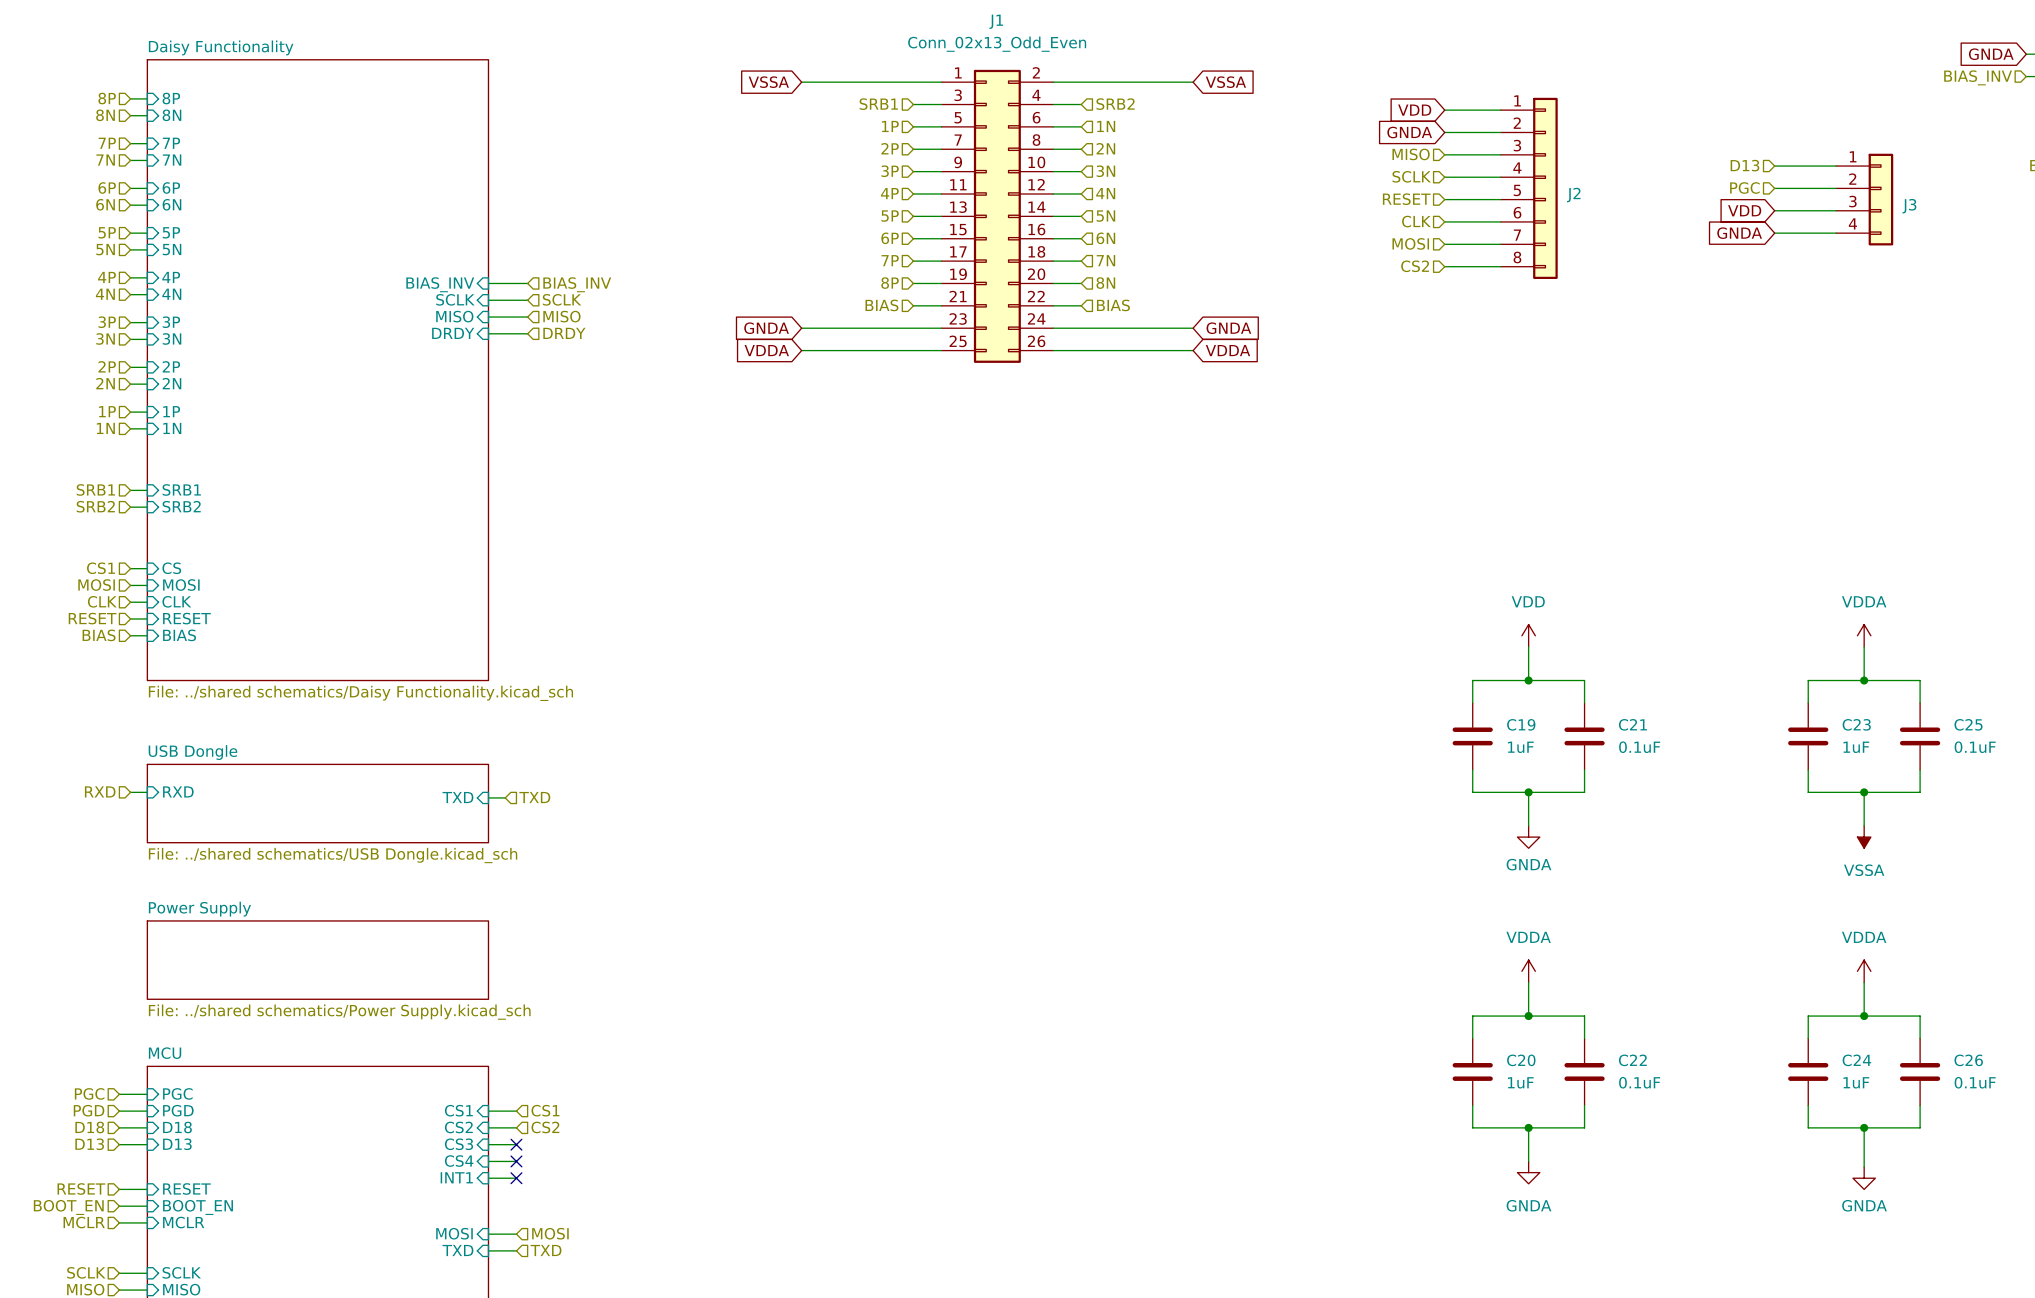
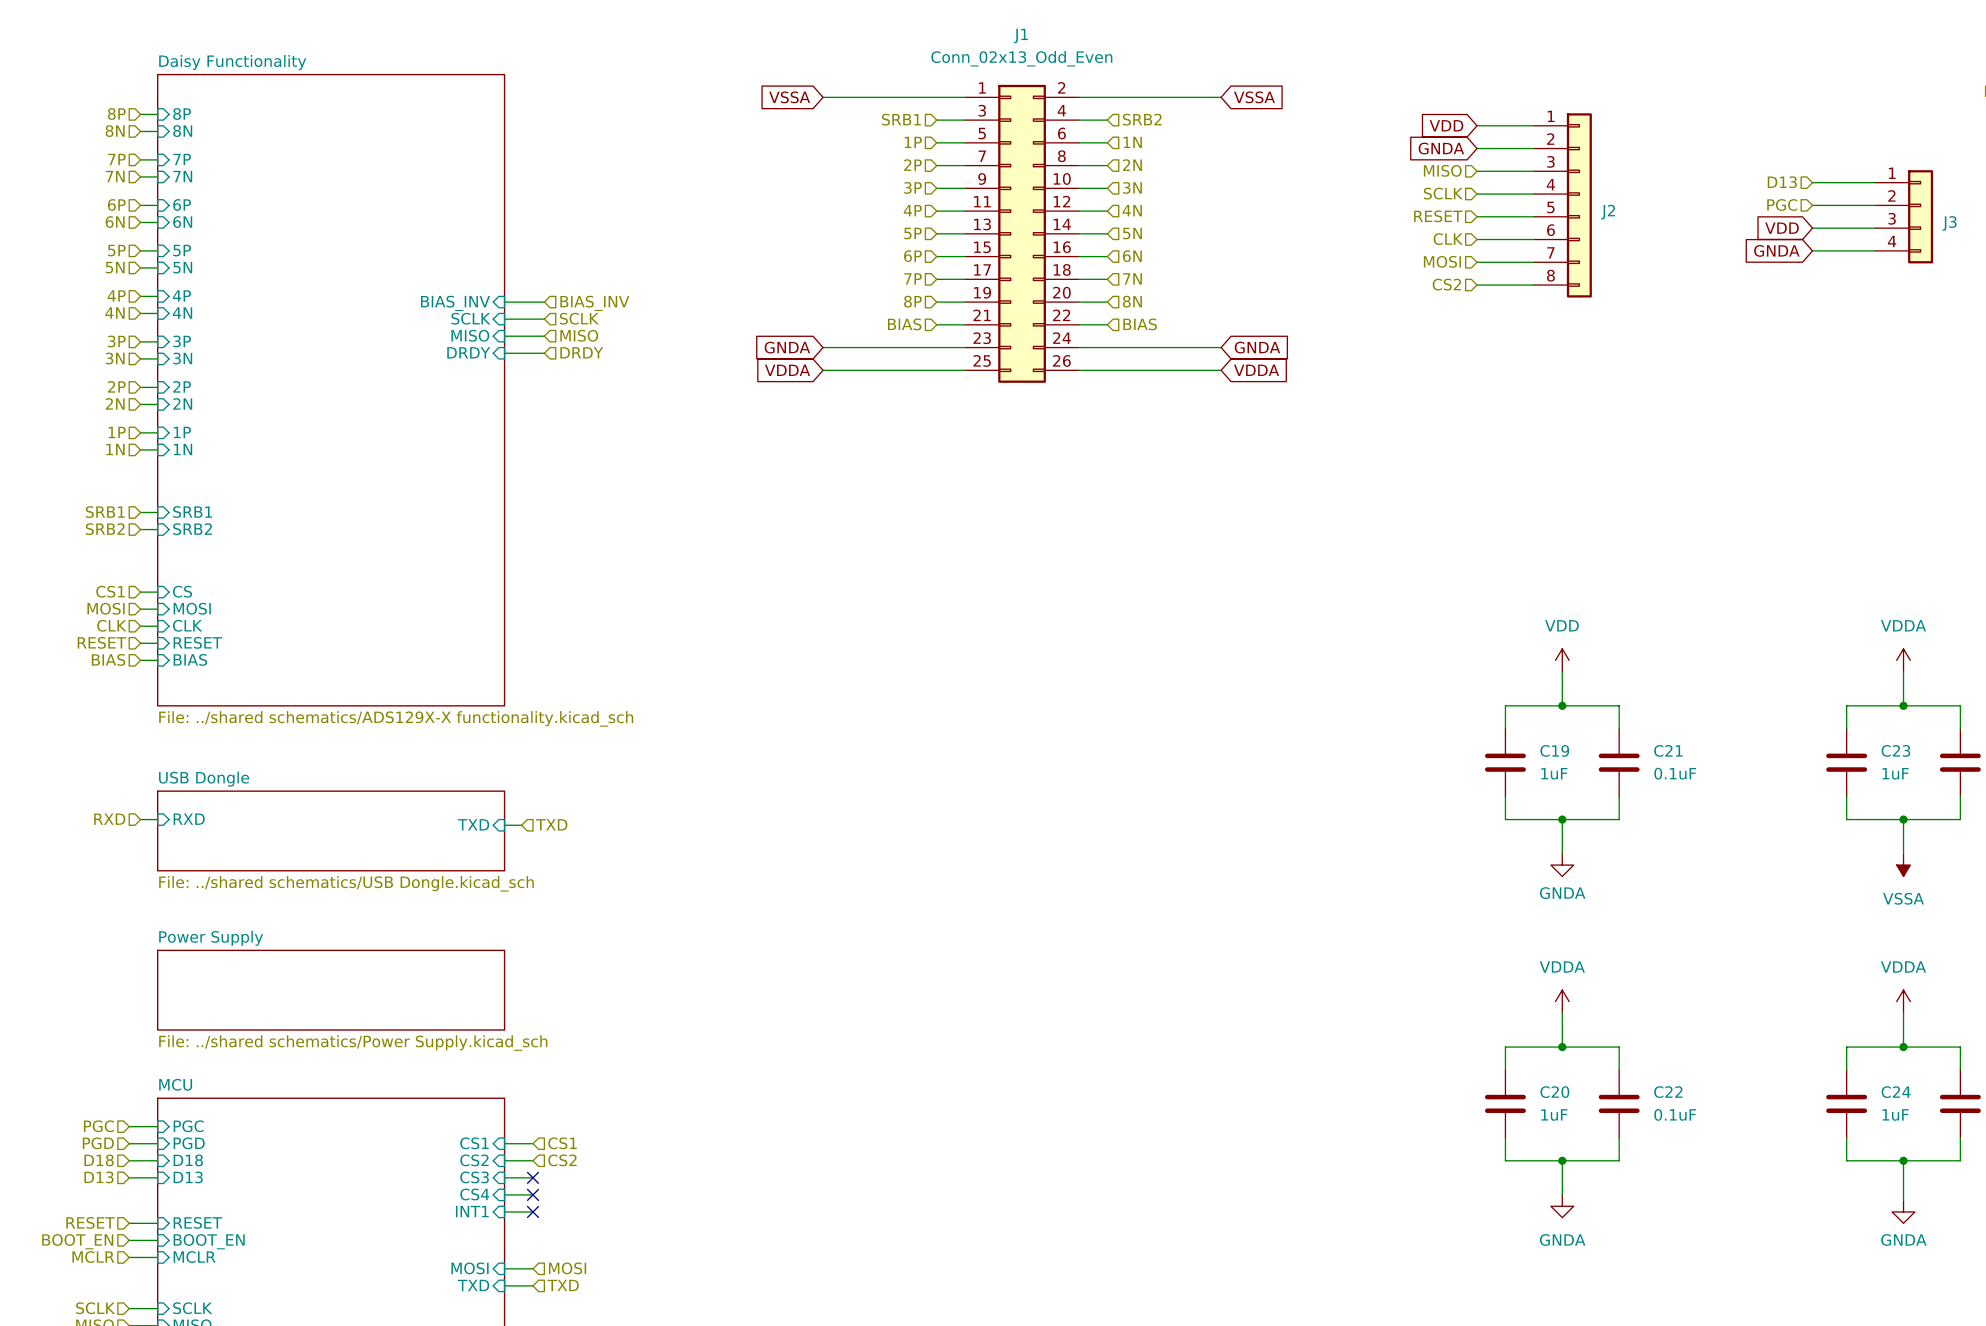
sheet Daisy Functionality value: File: ../shared schematics/Daisy Functionality.kicad_sch (360, 693) -> File: ../shared schematics/ADS129X-X functionality.kicad_sch (396, 718)

